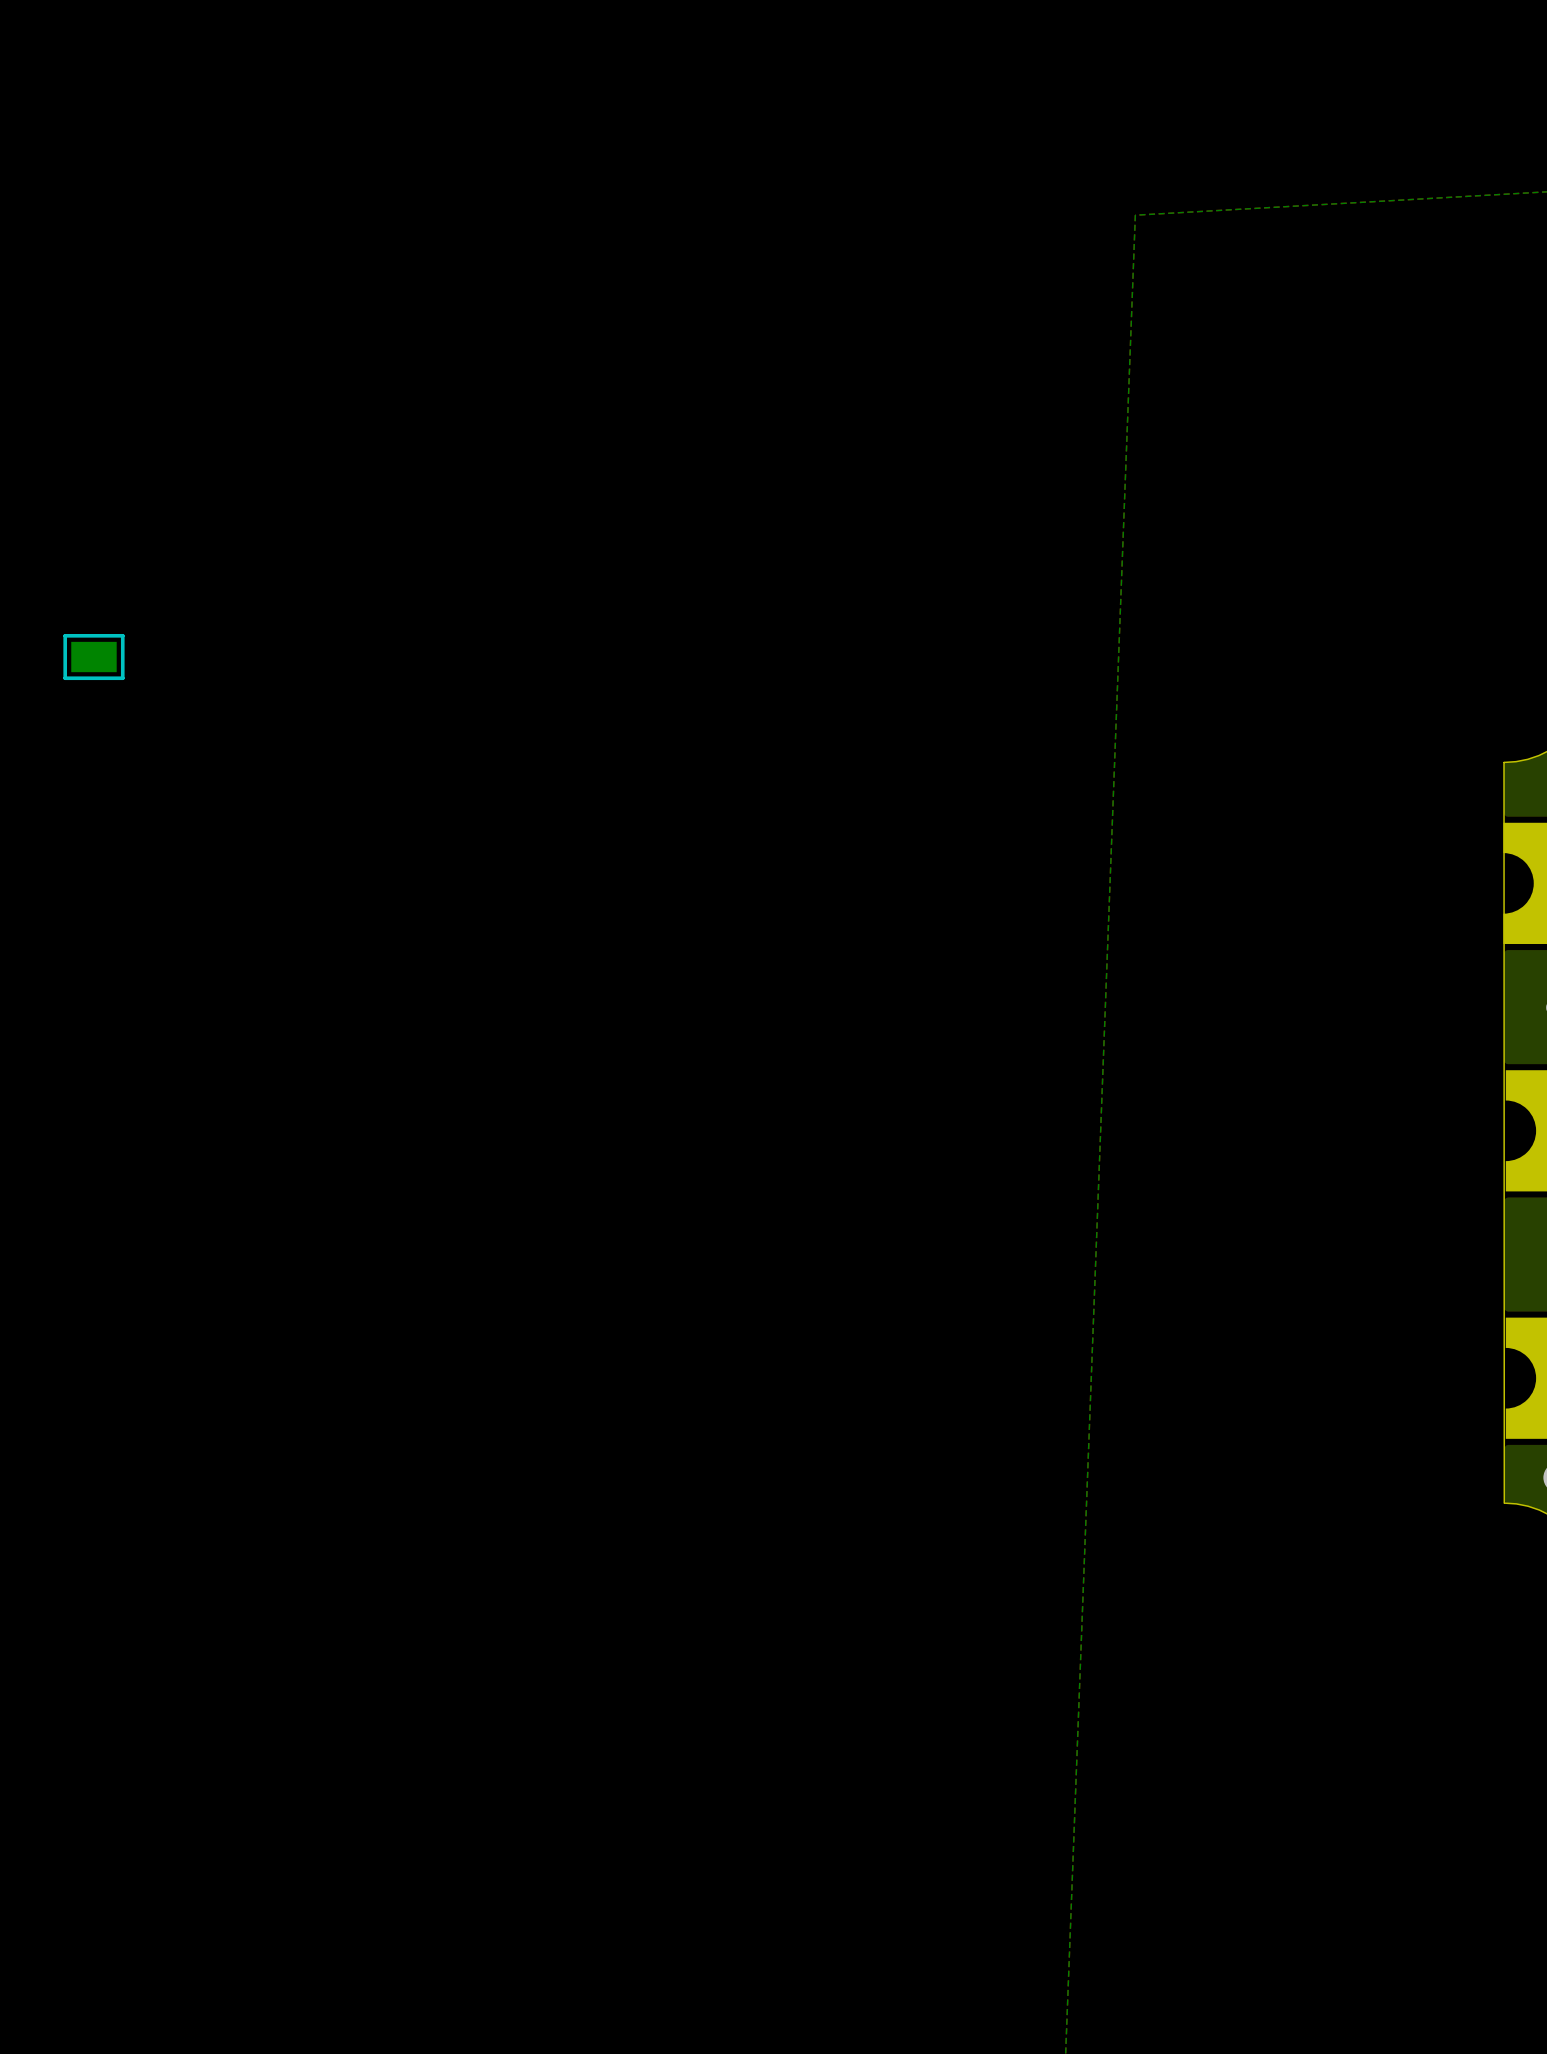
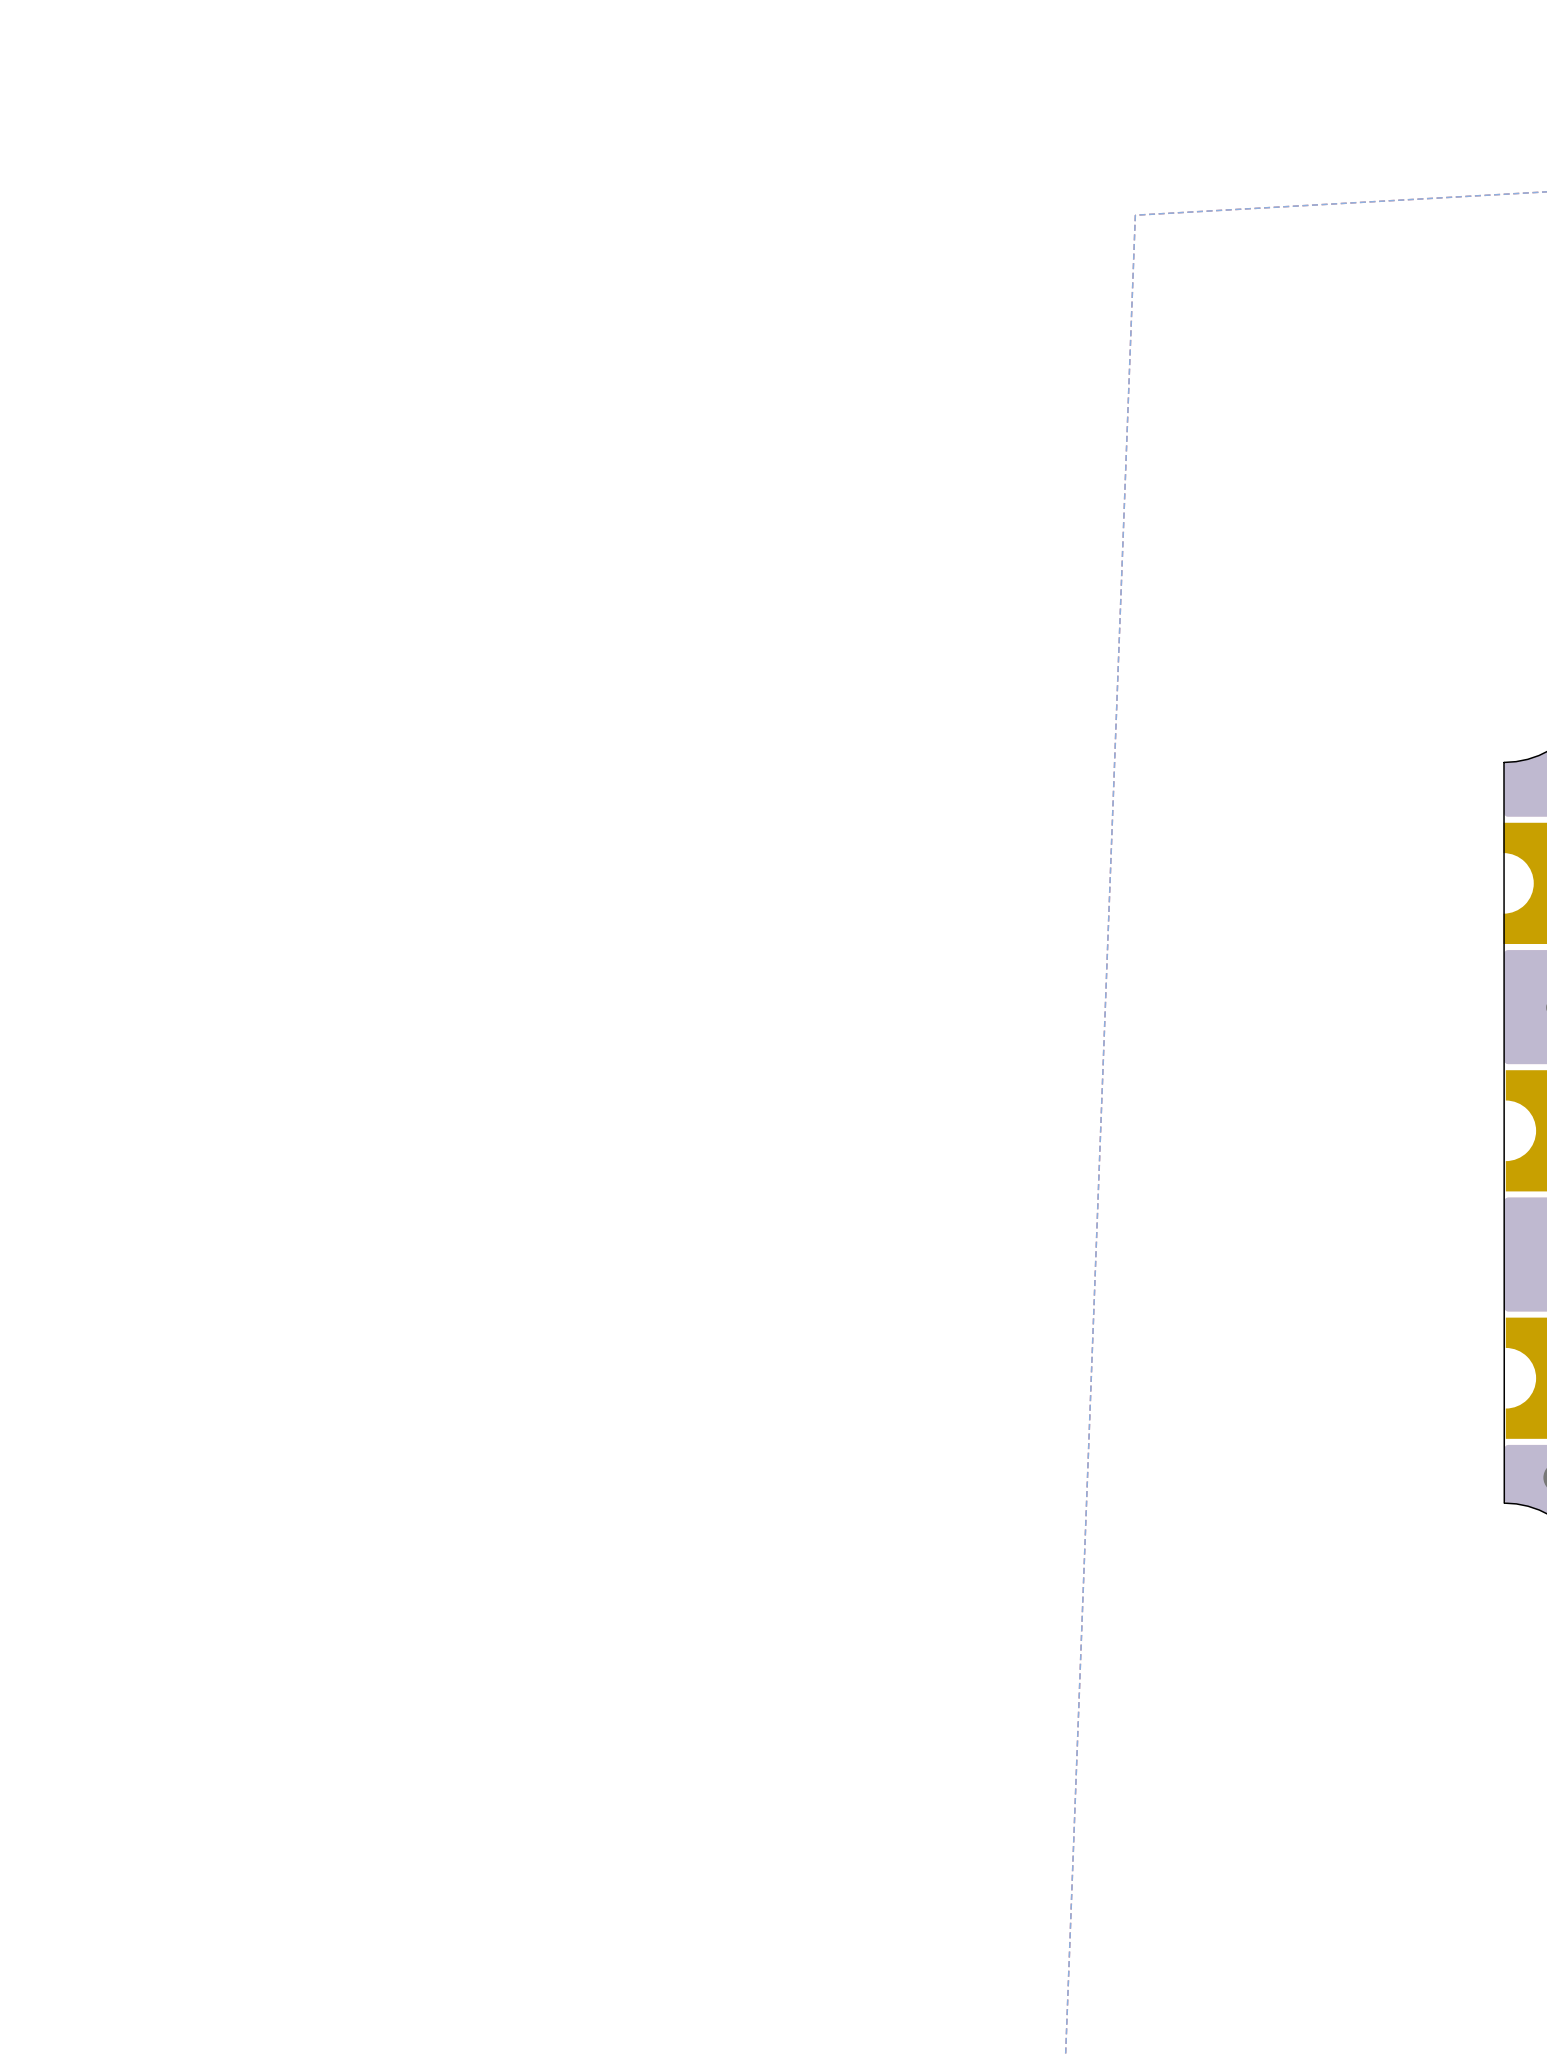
part: (93, 657) -> none

